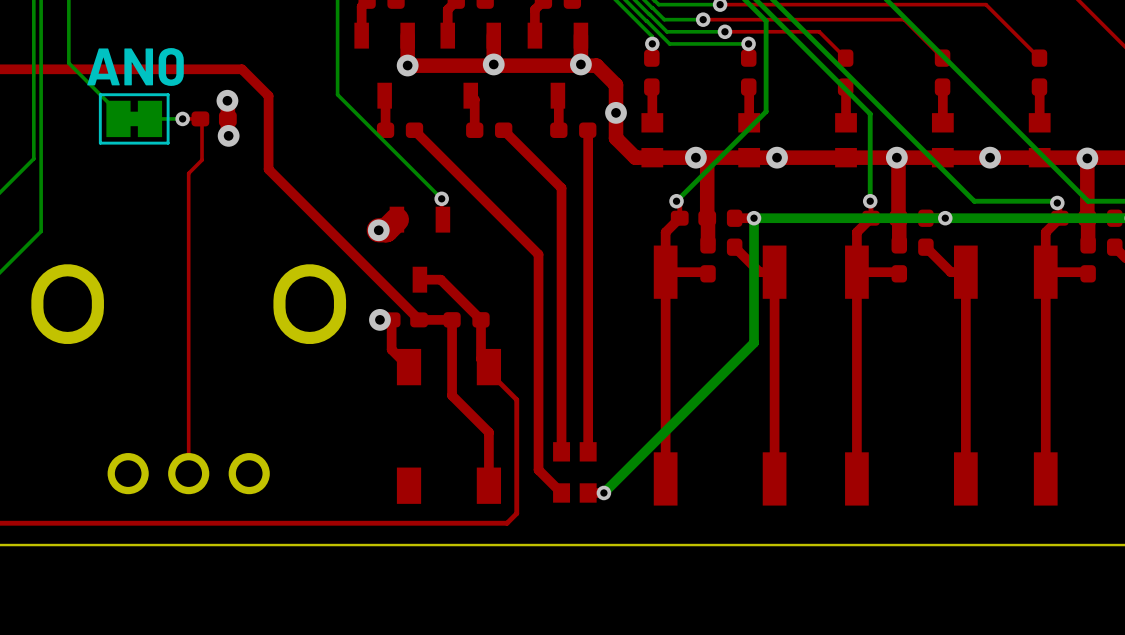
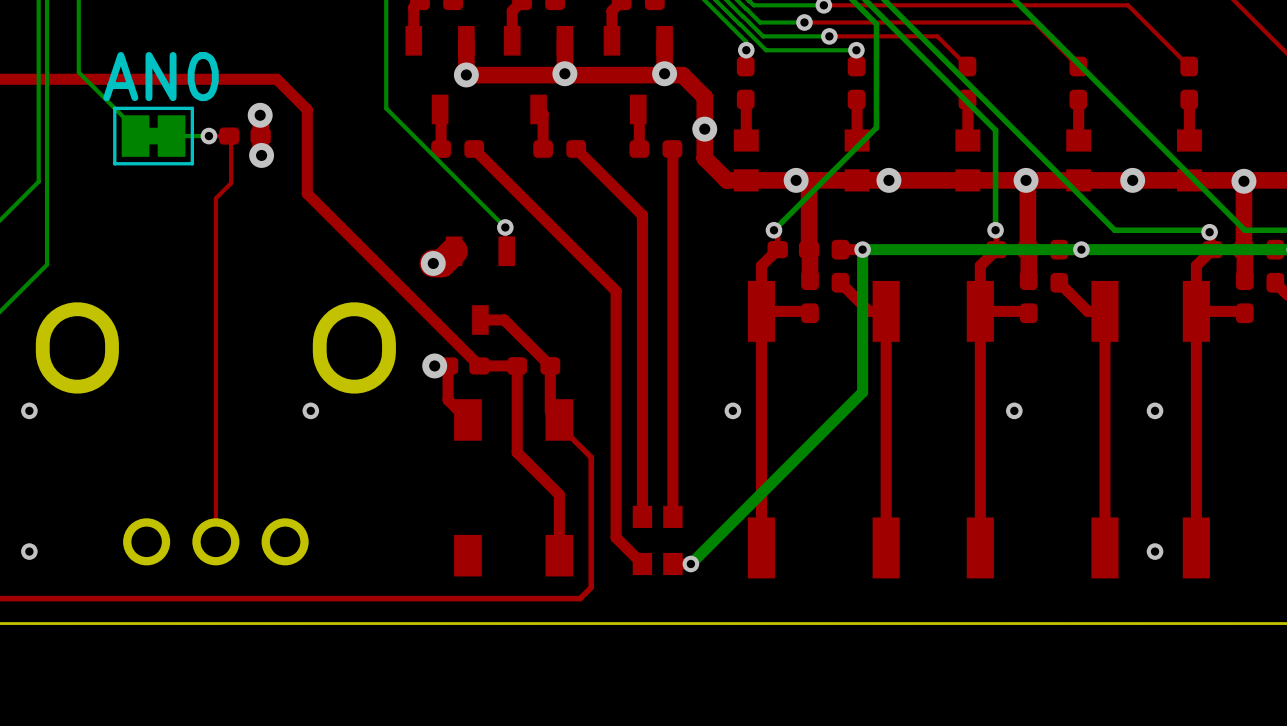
via: none -> (29, 410)
via: none -> (310, 410)
via: none -> (732, 410)
via: none -> (1014, 410)
via: none -> (1155, 410)
via: none -> (29, 551)
via: none -> (1155, 551)

